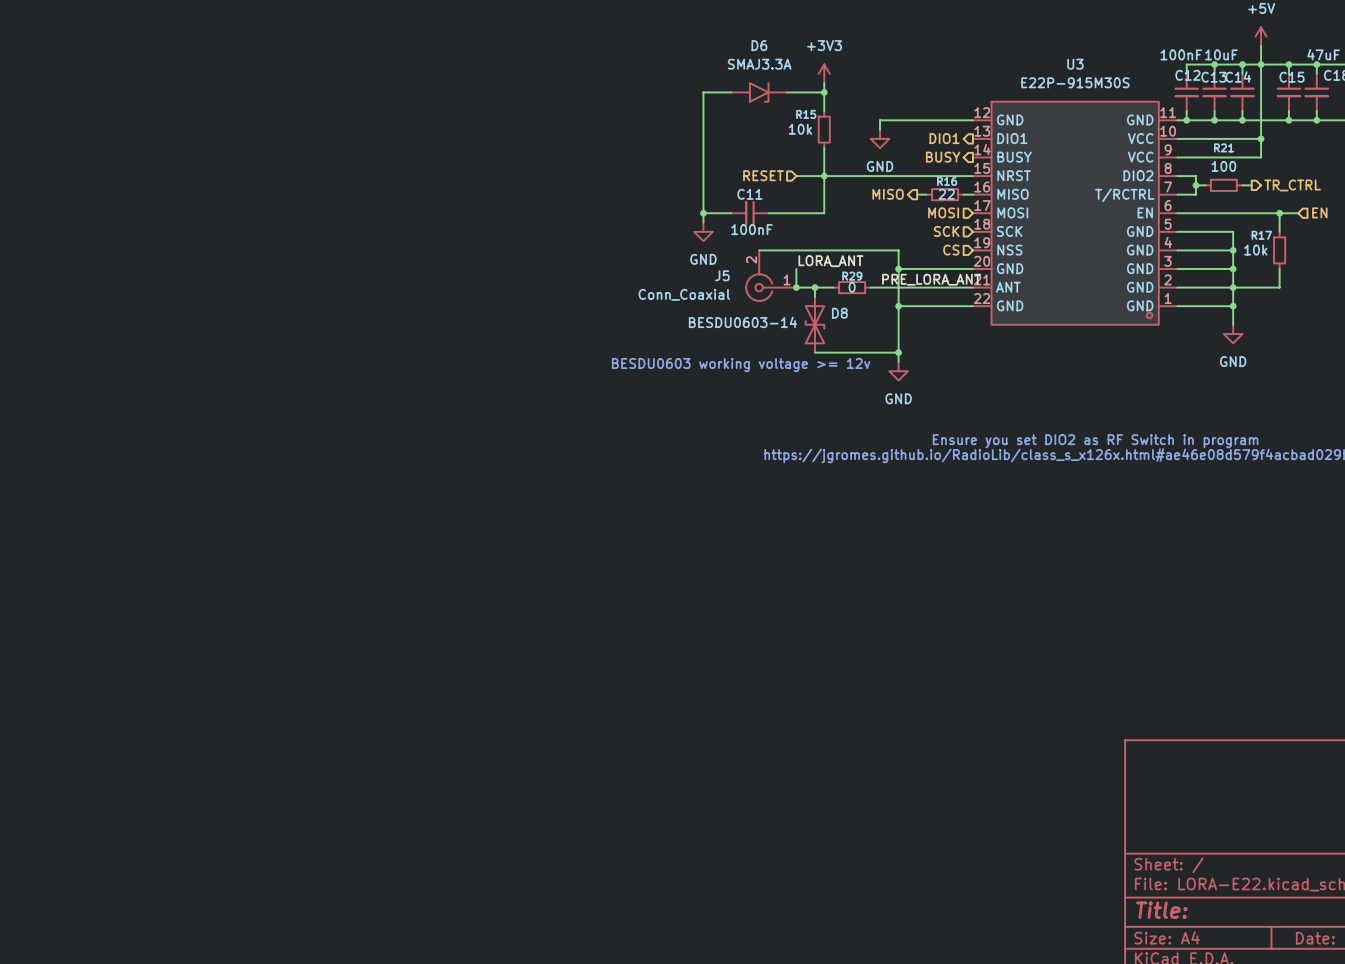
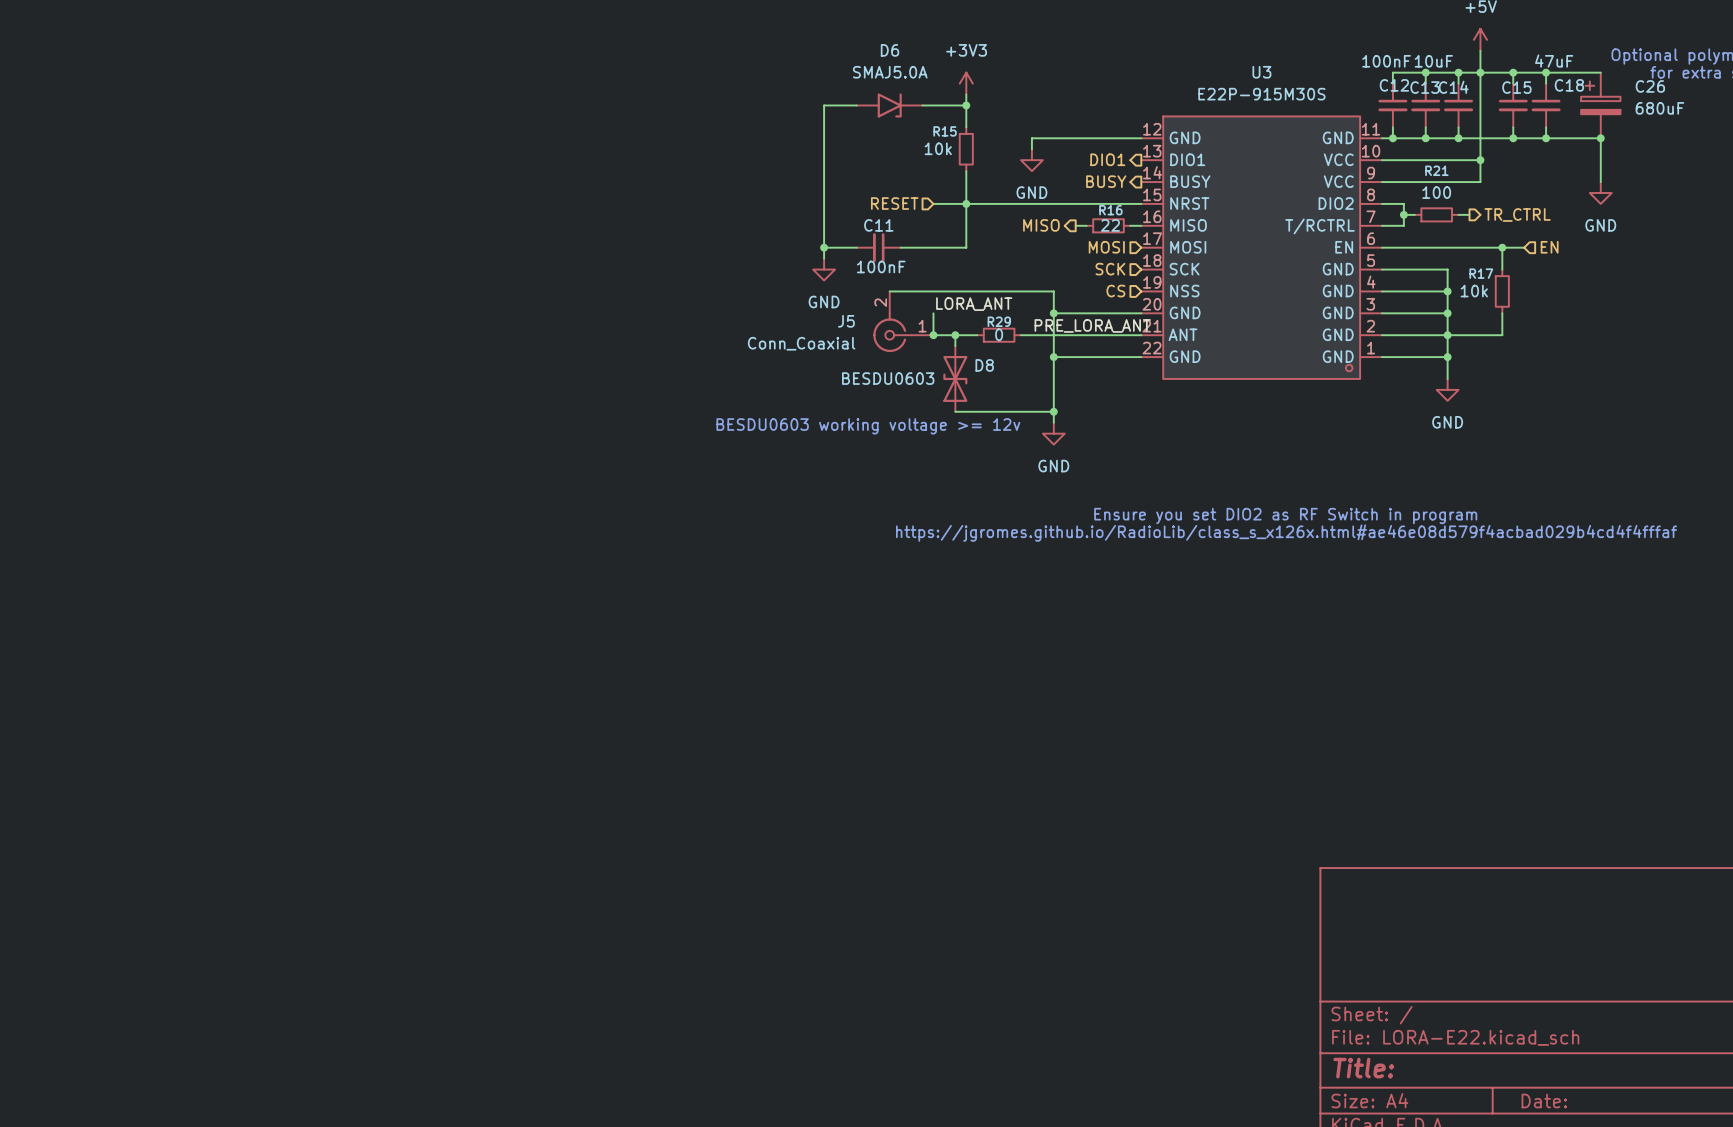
D6 value: SMAJ3.3A (759, 64) -> SMAJ5.0A (890, 72)
D8 value: BESDU0603-14 (743, 322) -> BESDU0603 (888, 378)

